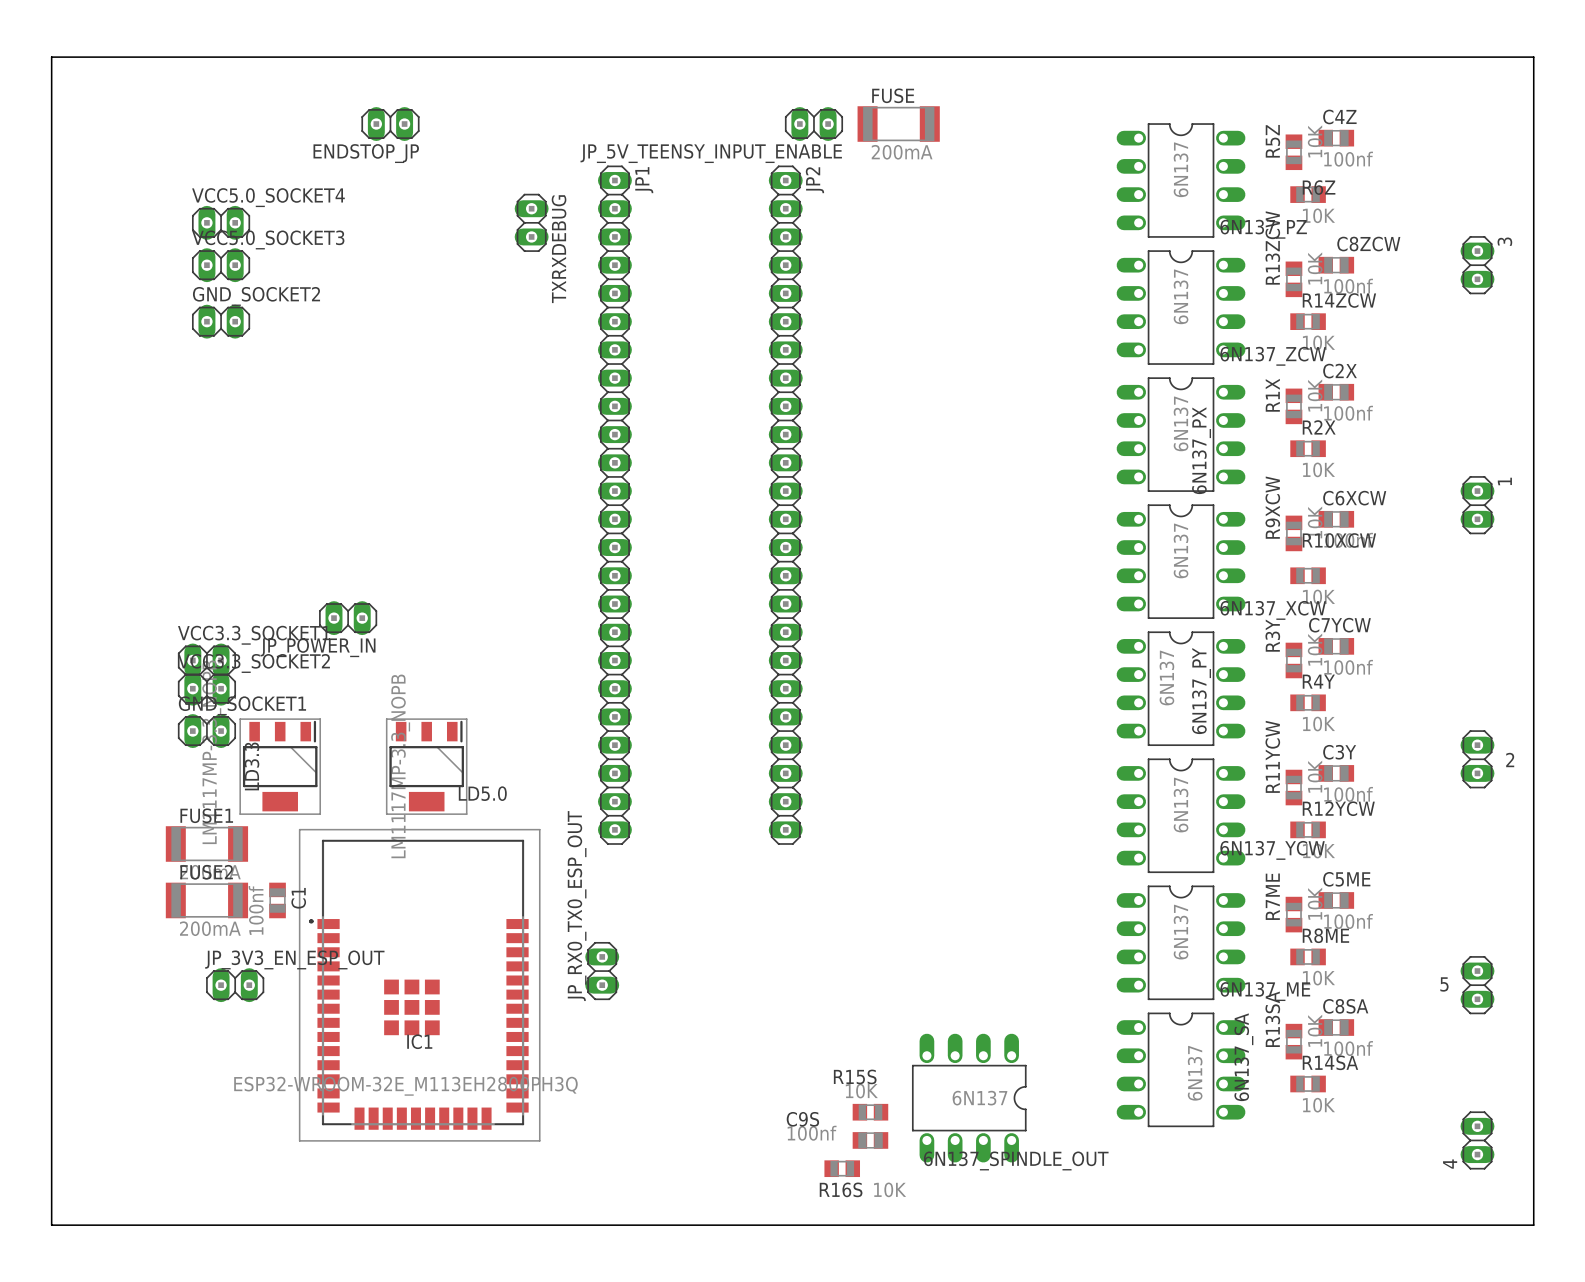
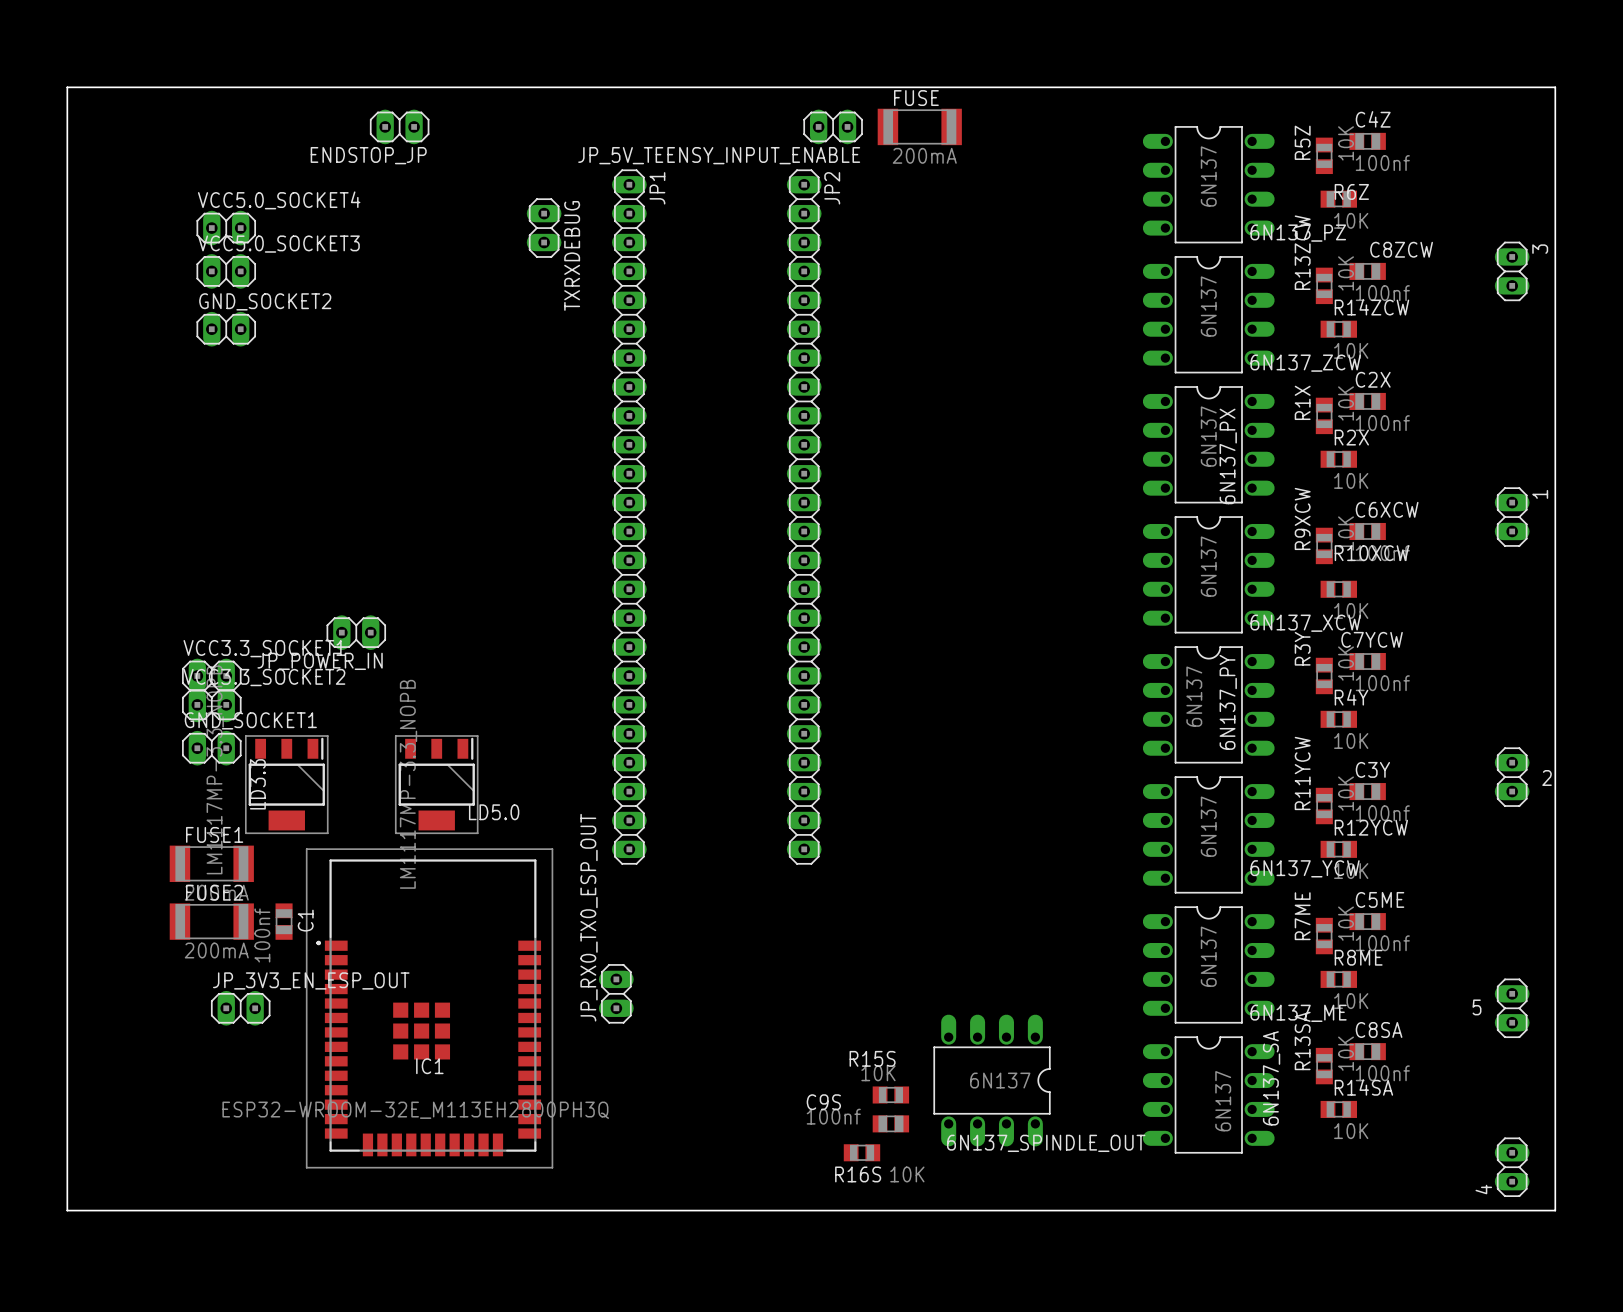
board edge: (51, 57) (1533, 57) (1533, 1225) (51, 1225) (51, 57) -> (67, 87) (67, 1210) (1555, 1210) (1555, 87) (67, 87)
6N137_SPINDLE_OUT position: (969, 1098) -> (992, 1080)
R15S position: (870, 1112) -> (890, 1094)
C9S position: (870, 1140) -> (890, 1123)
R16S position: (842, 1168) -> (861, 1152)

